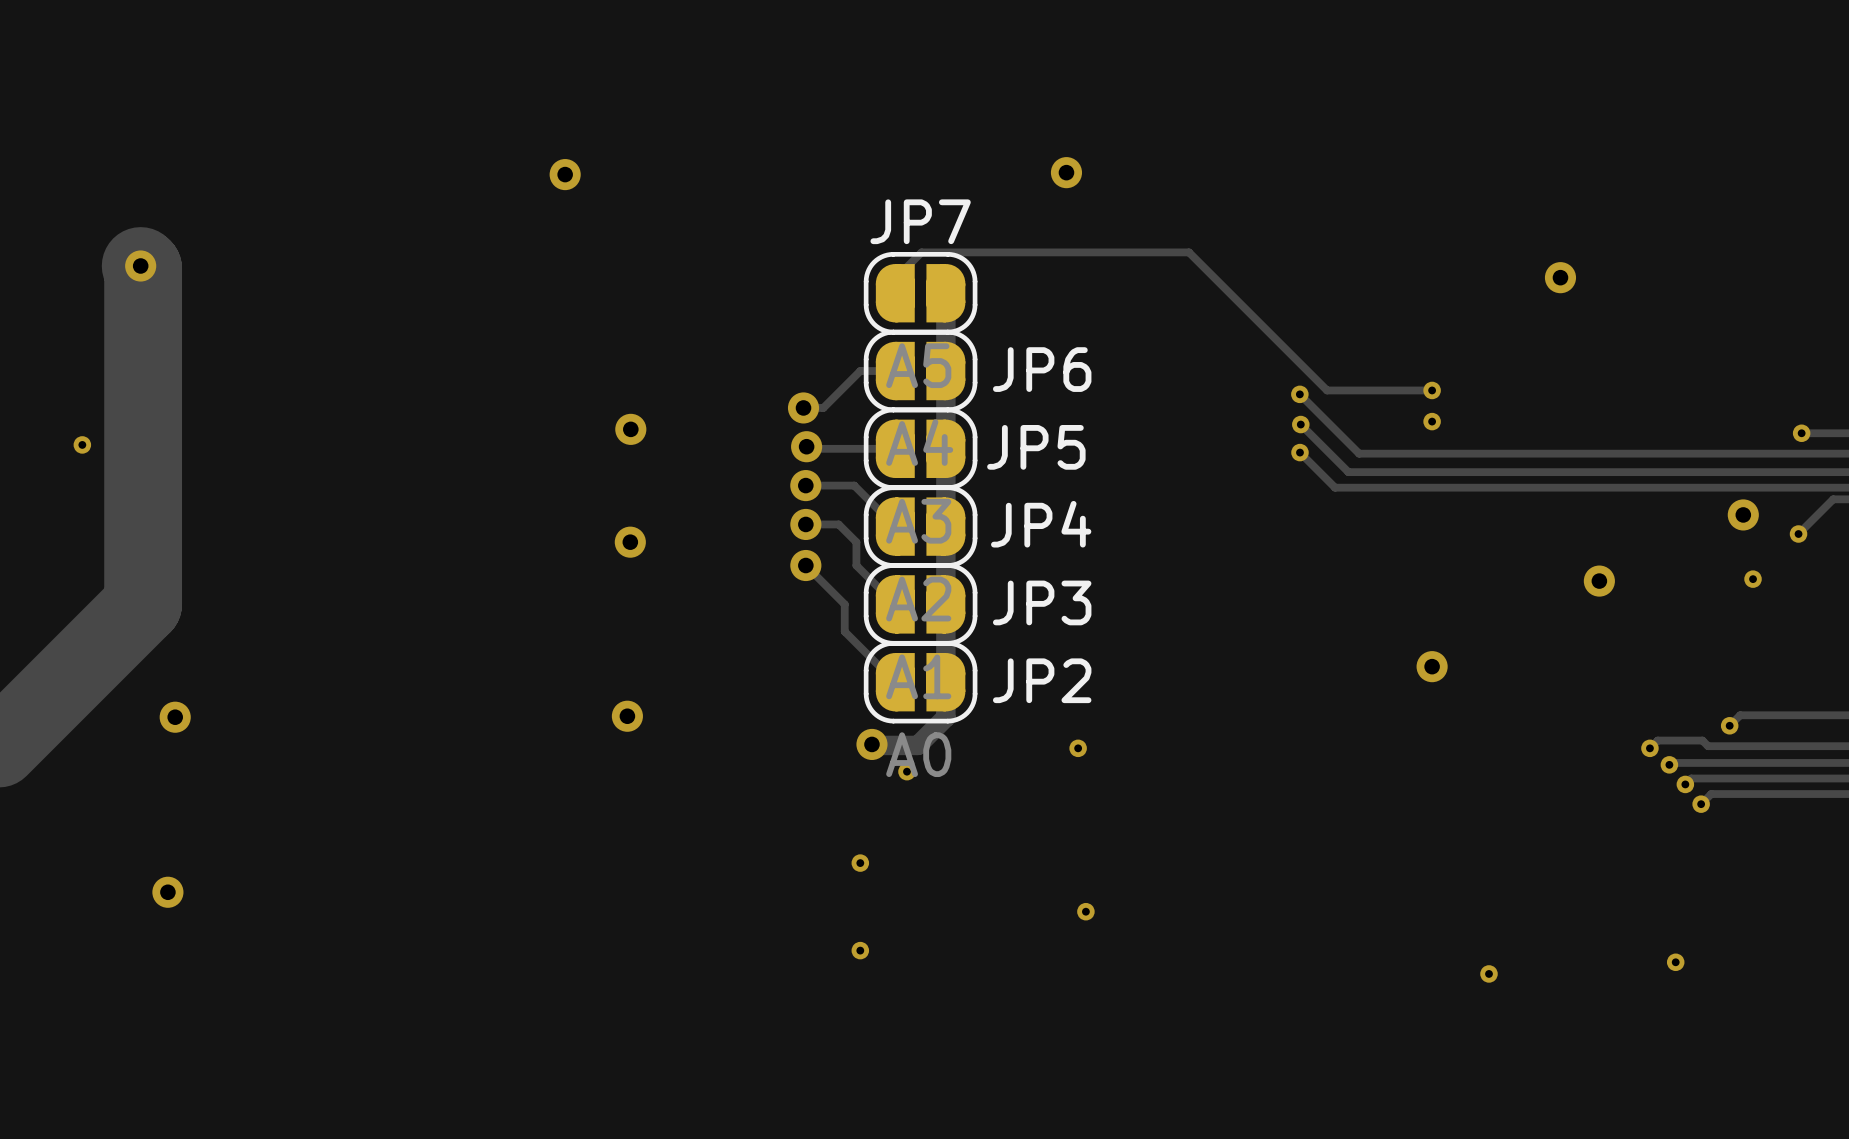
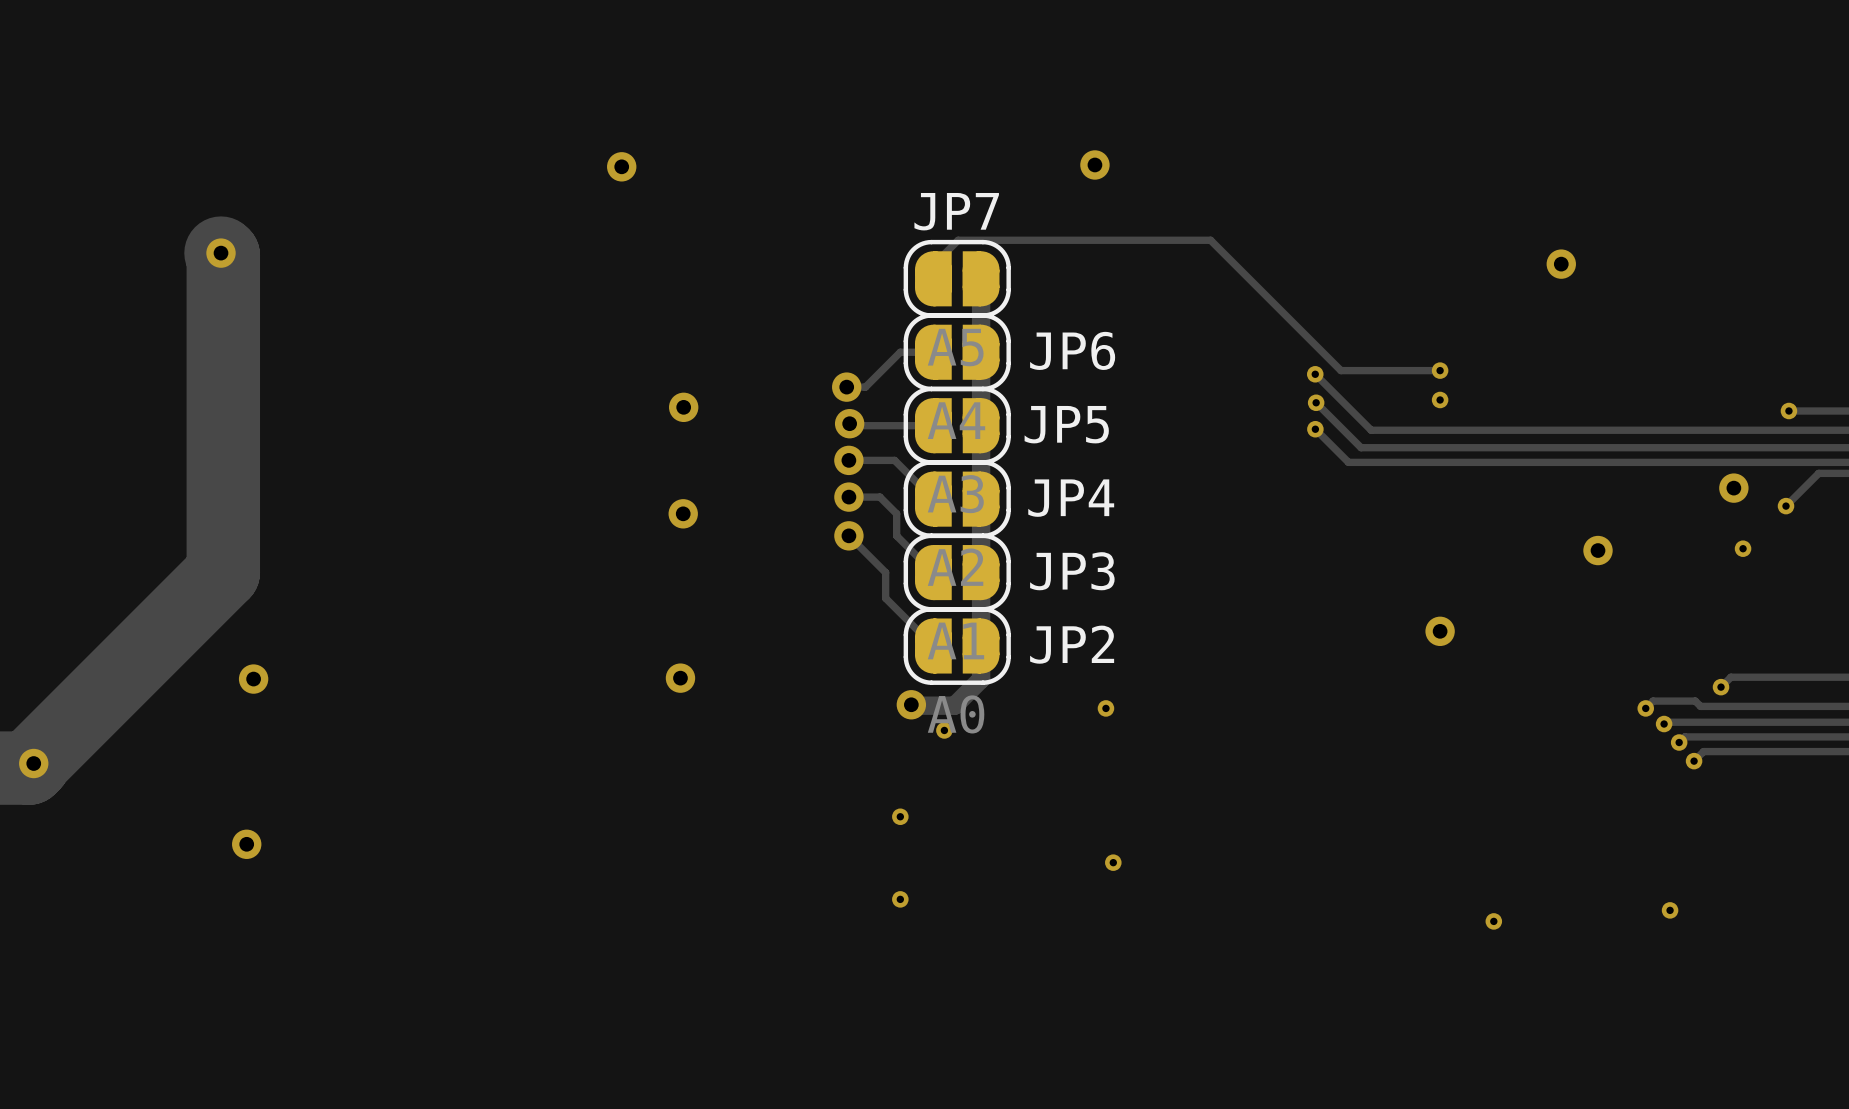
via: (82, 444) -> none

